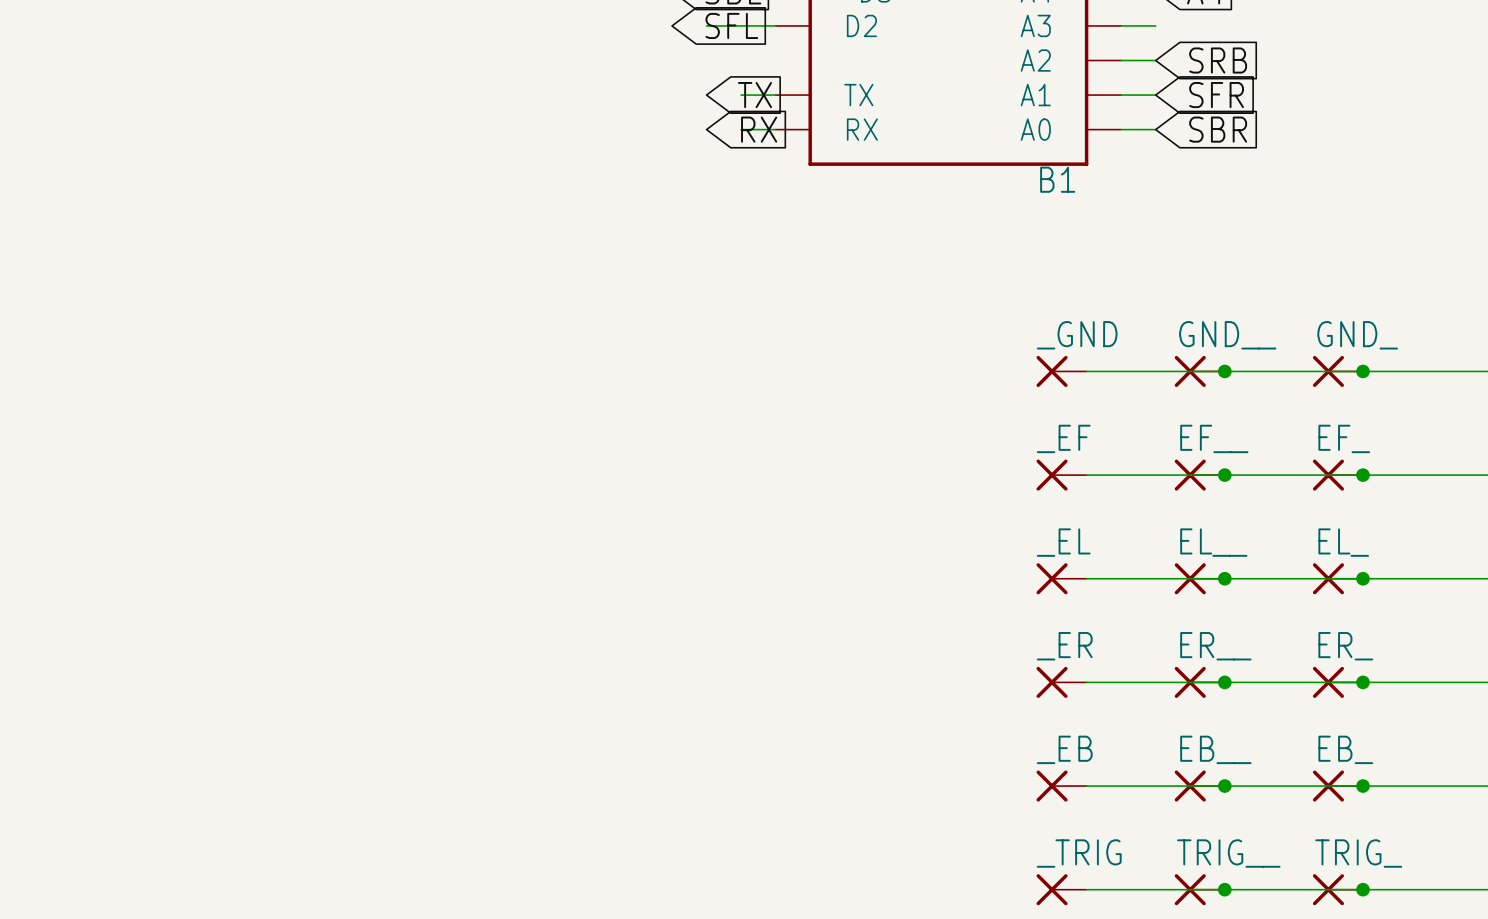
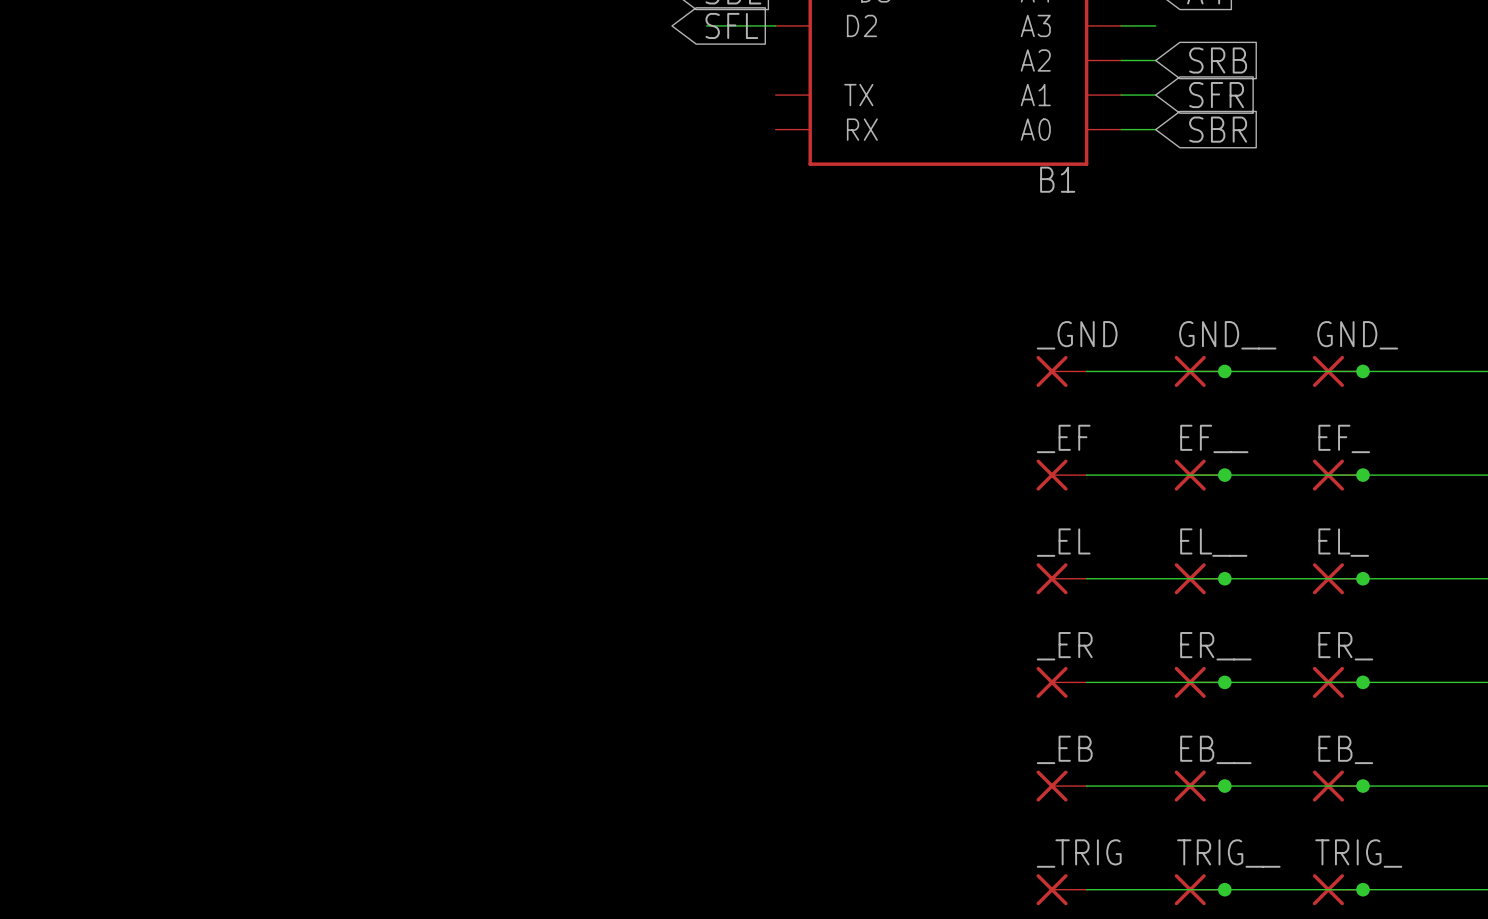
wire: (741, 95) (775, 95) -> none
global label: TX (754, 95) -> none
wire: (741, 129) (775, 129) -> none
global label: RX (759, 129) -> none

